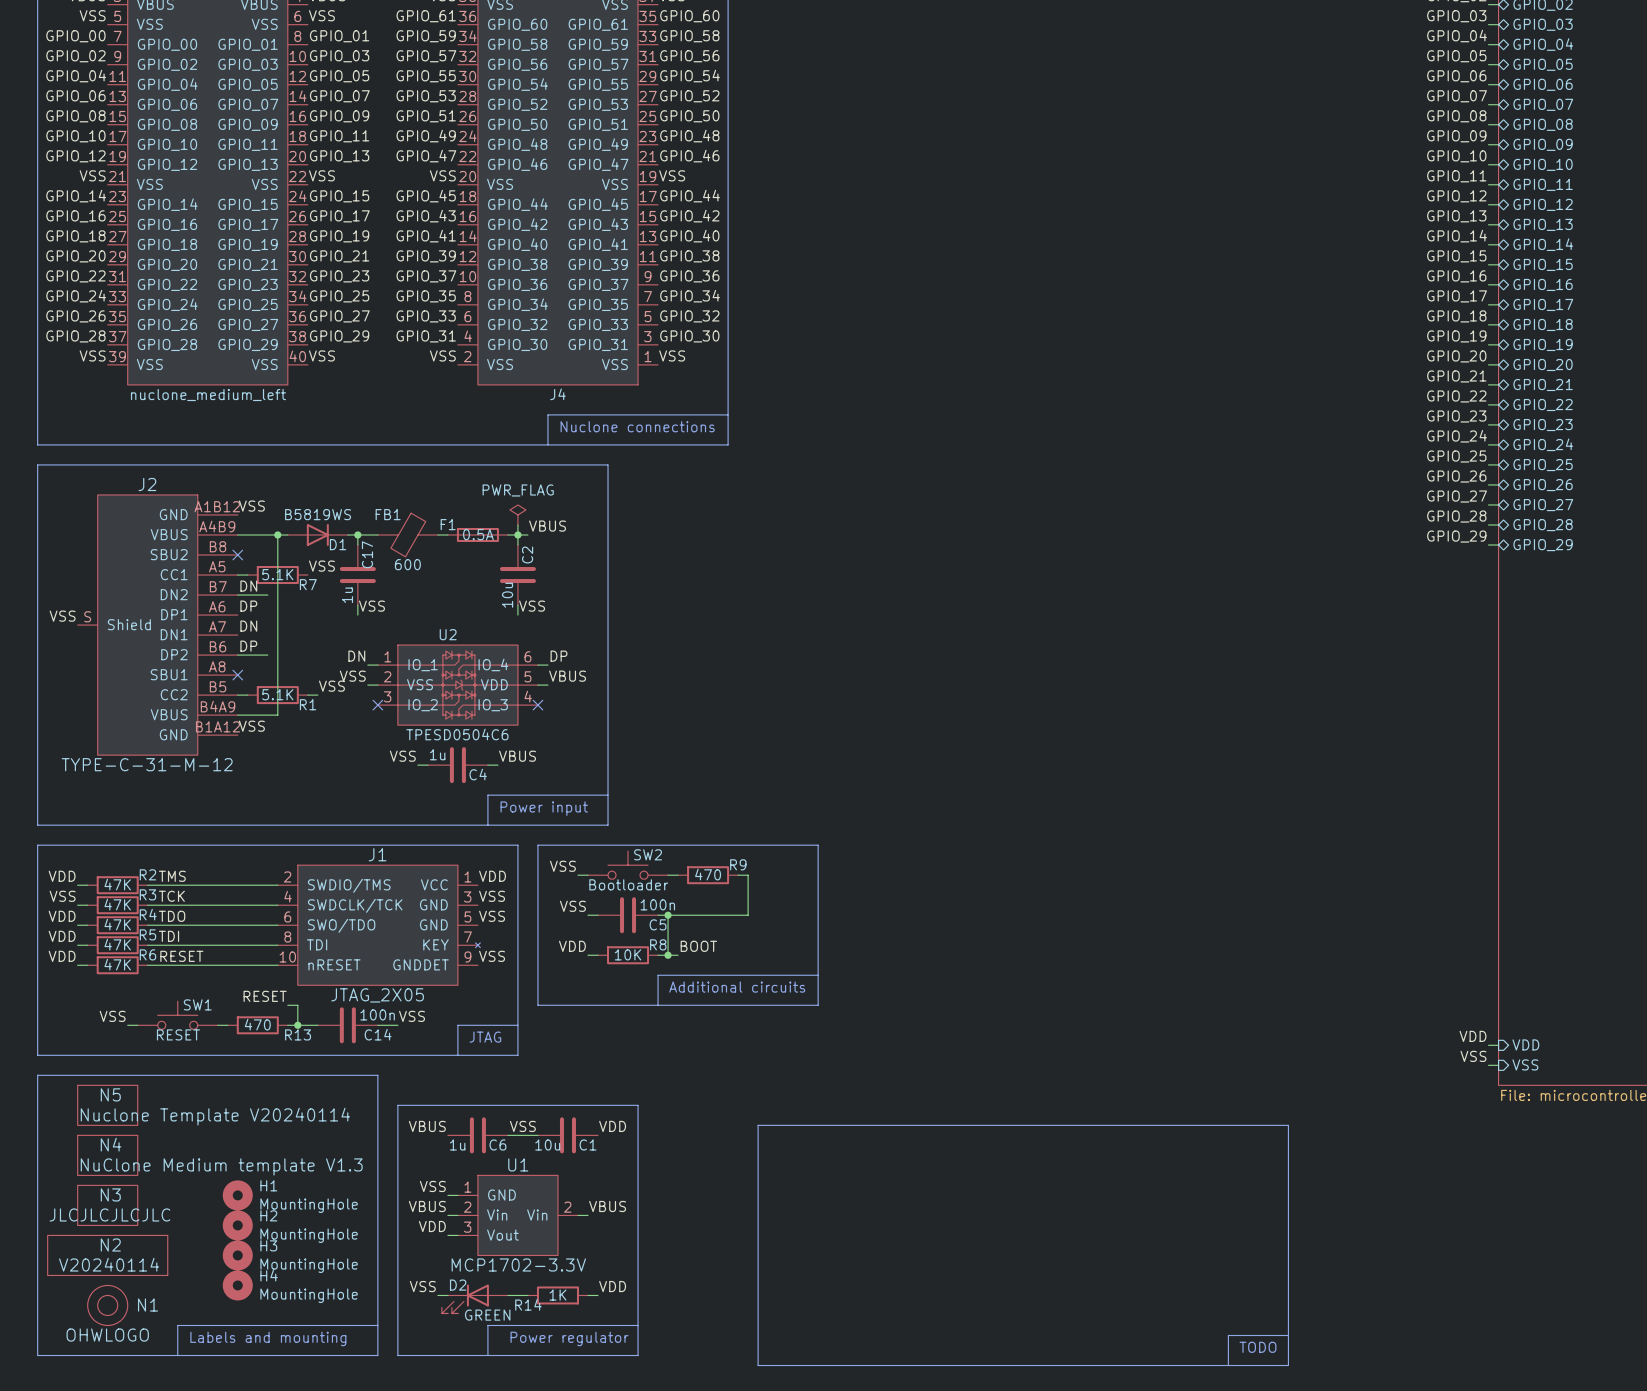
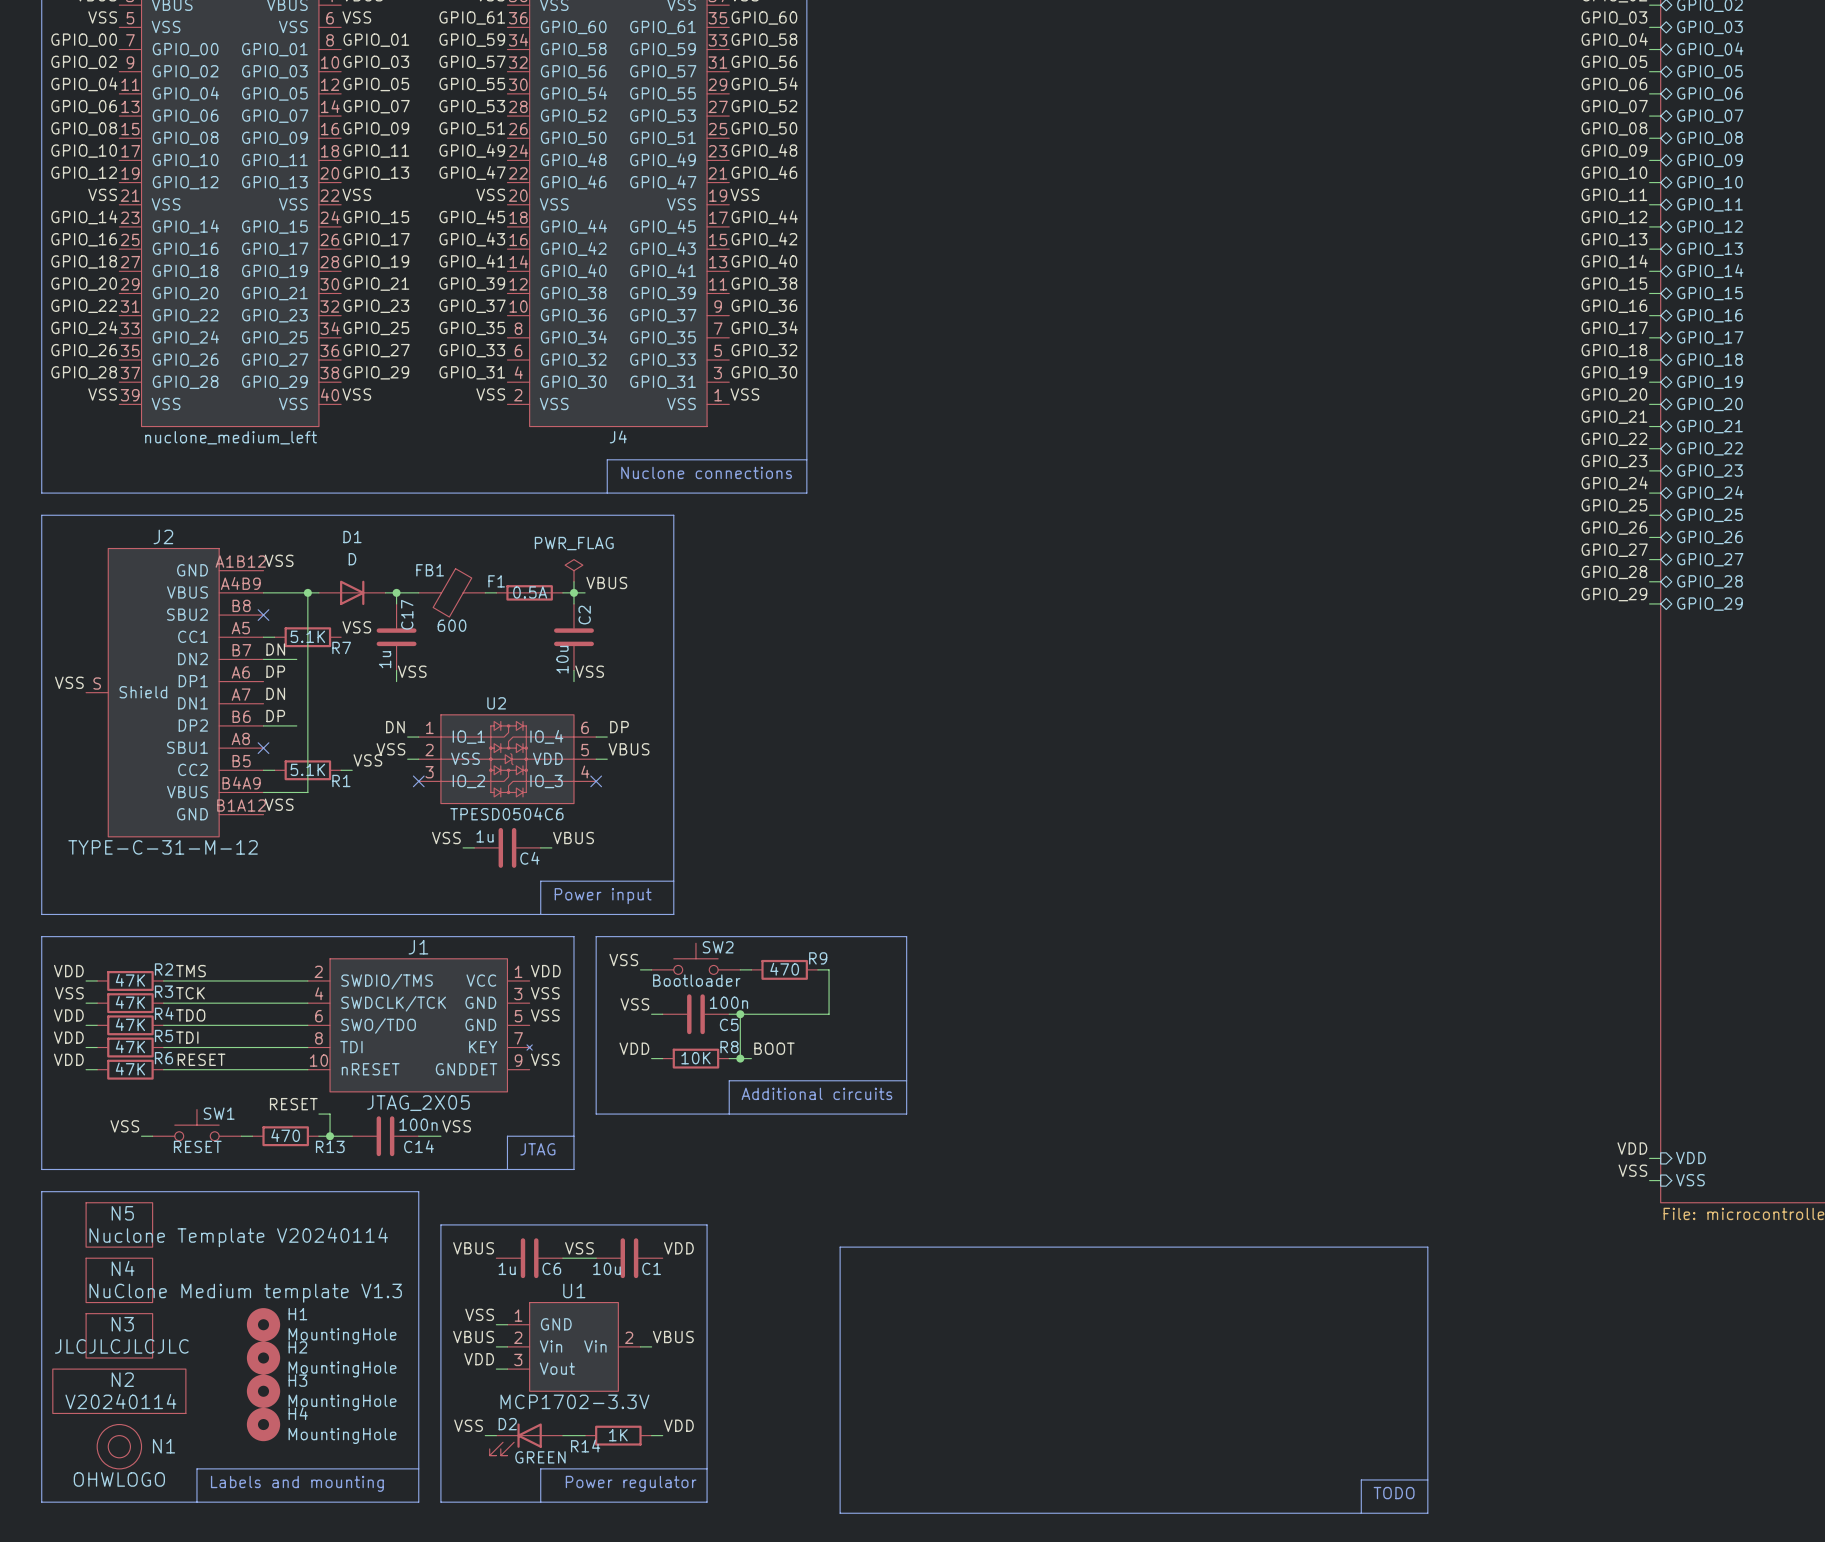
D1 value: B5819WS (318, 514) -> D (352, 559)
D1 name position: D1 (338, 544) -> D1 (352, 537)

